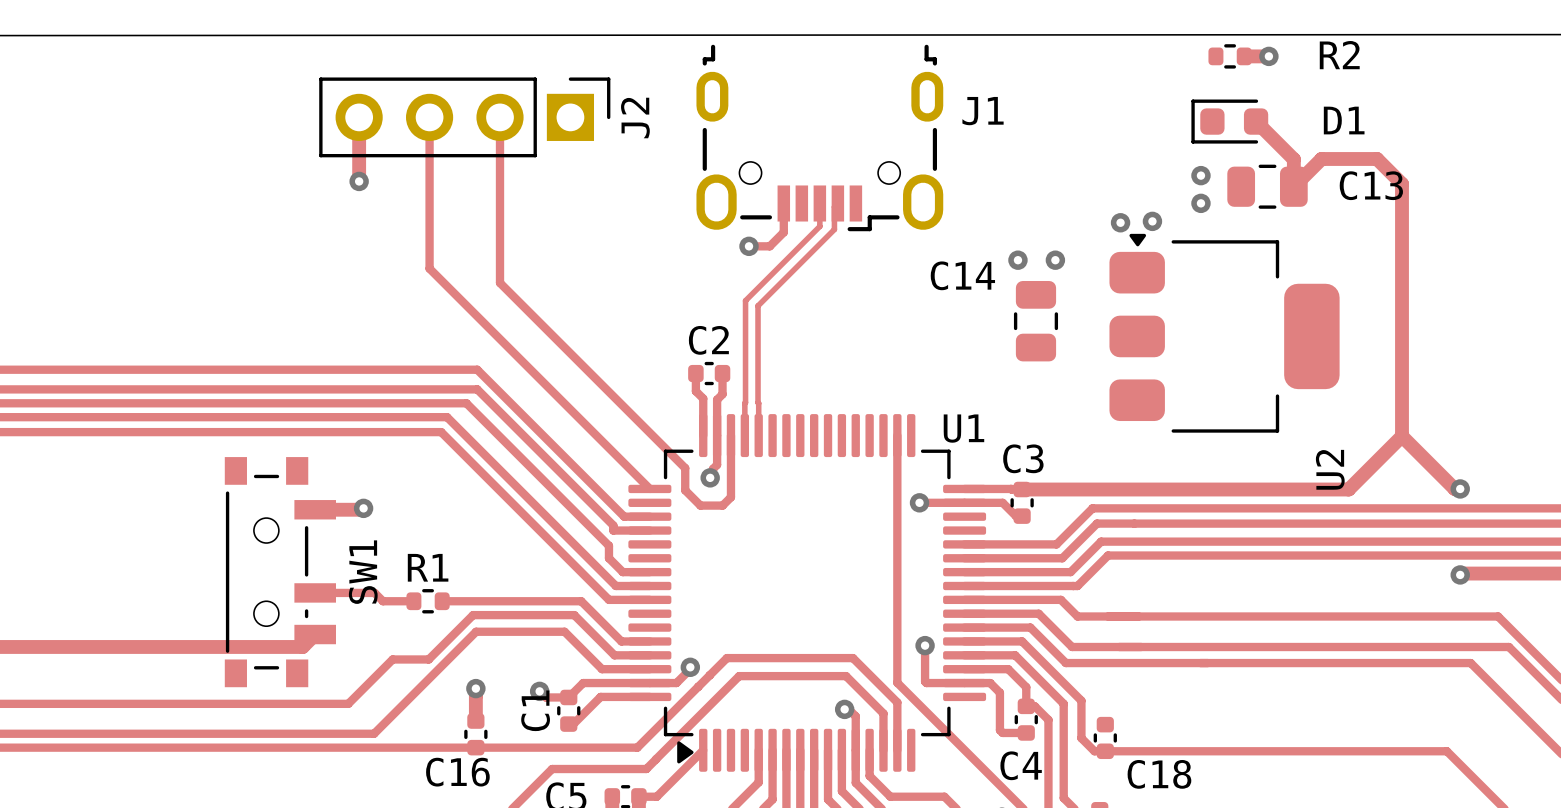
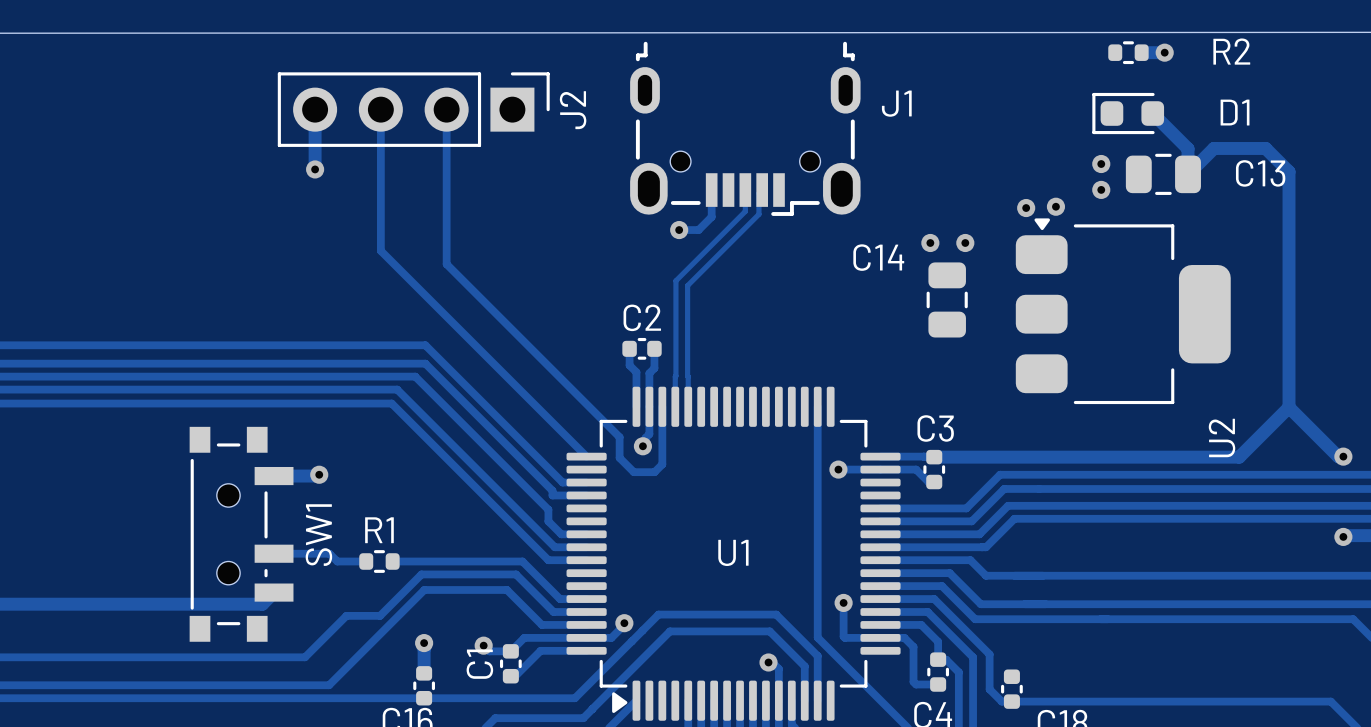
U1 name position: U1 (963, 428) -> U1 (733, 552)

